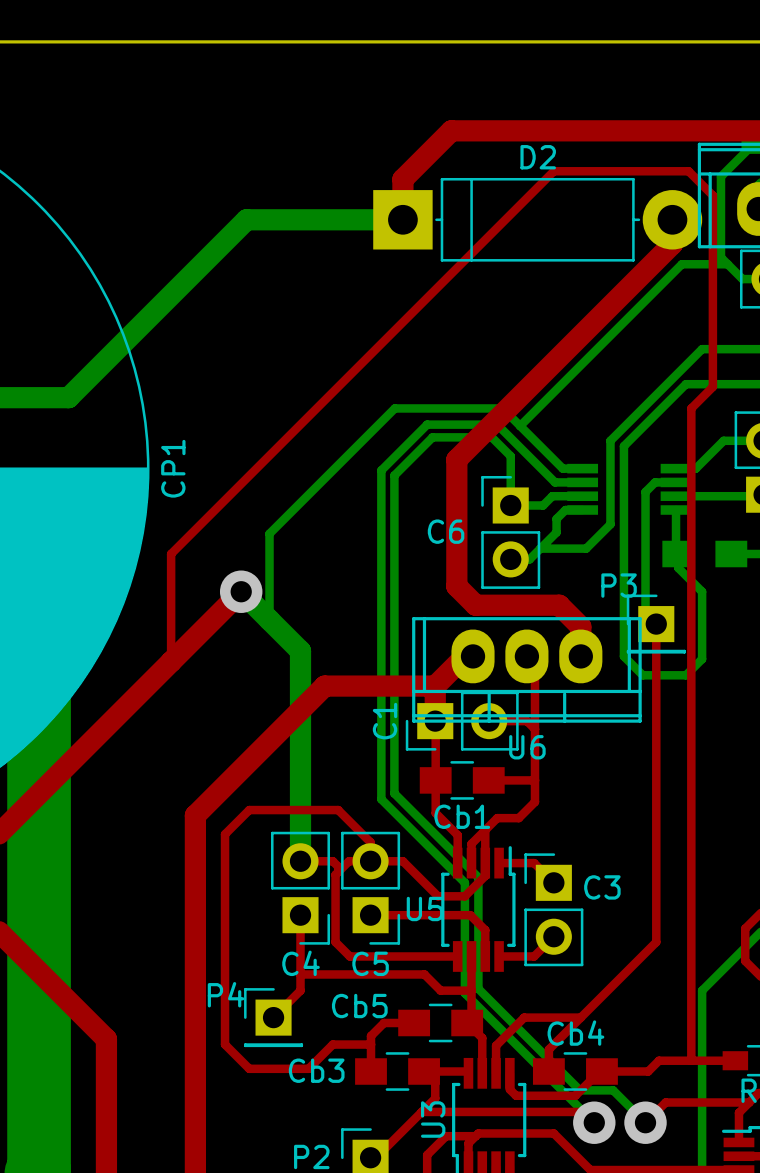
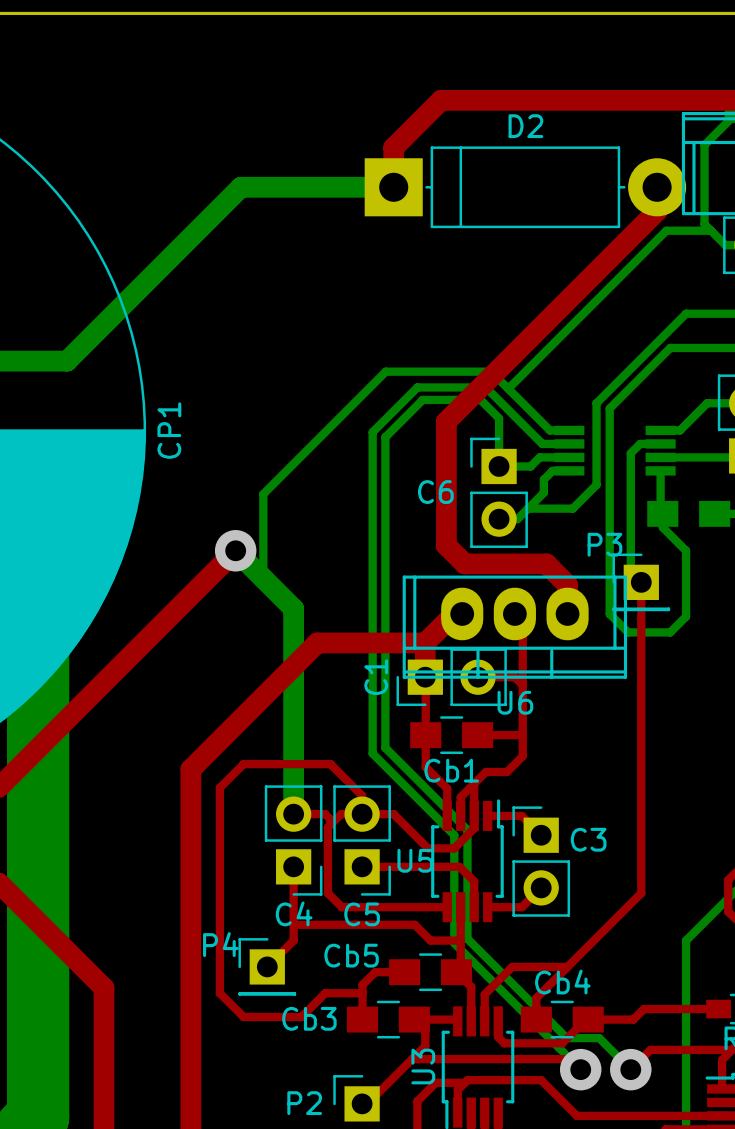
top track: (171, 661) (171, 554) (553, 171) (688, 171) (712, 195) (712, 386) (691, 408) (691, 1060) -> none

